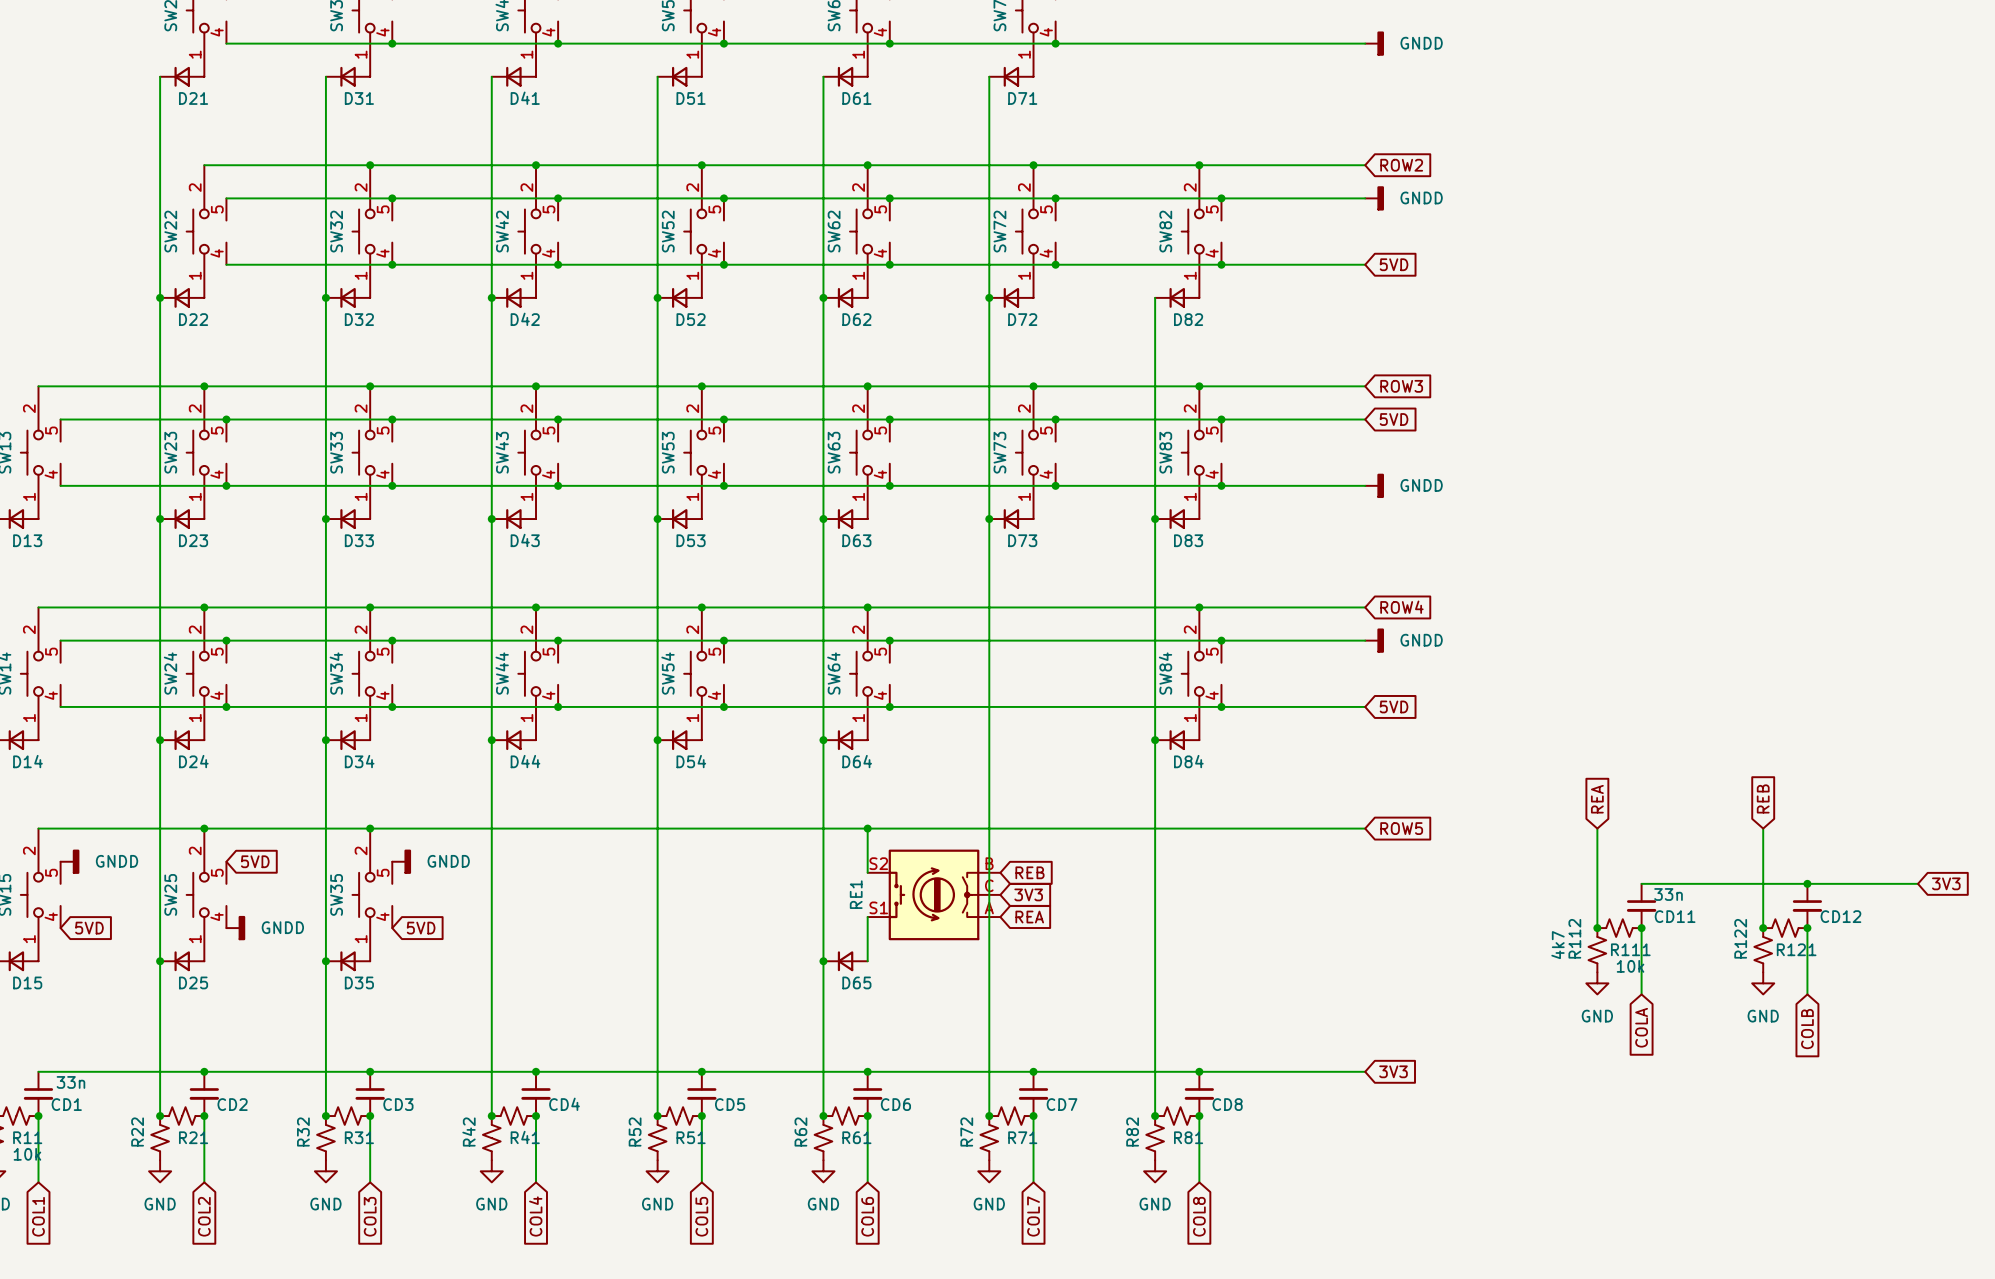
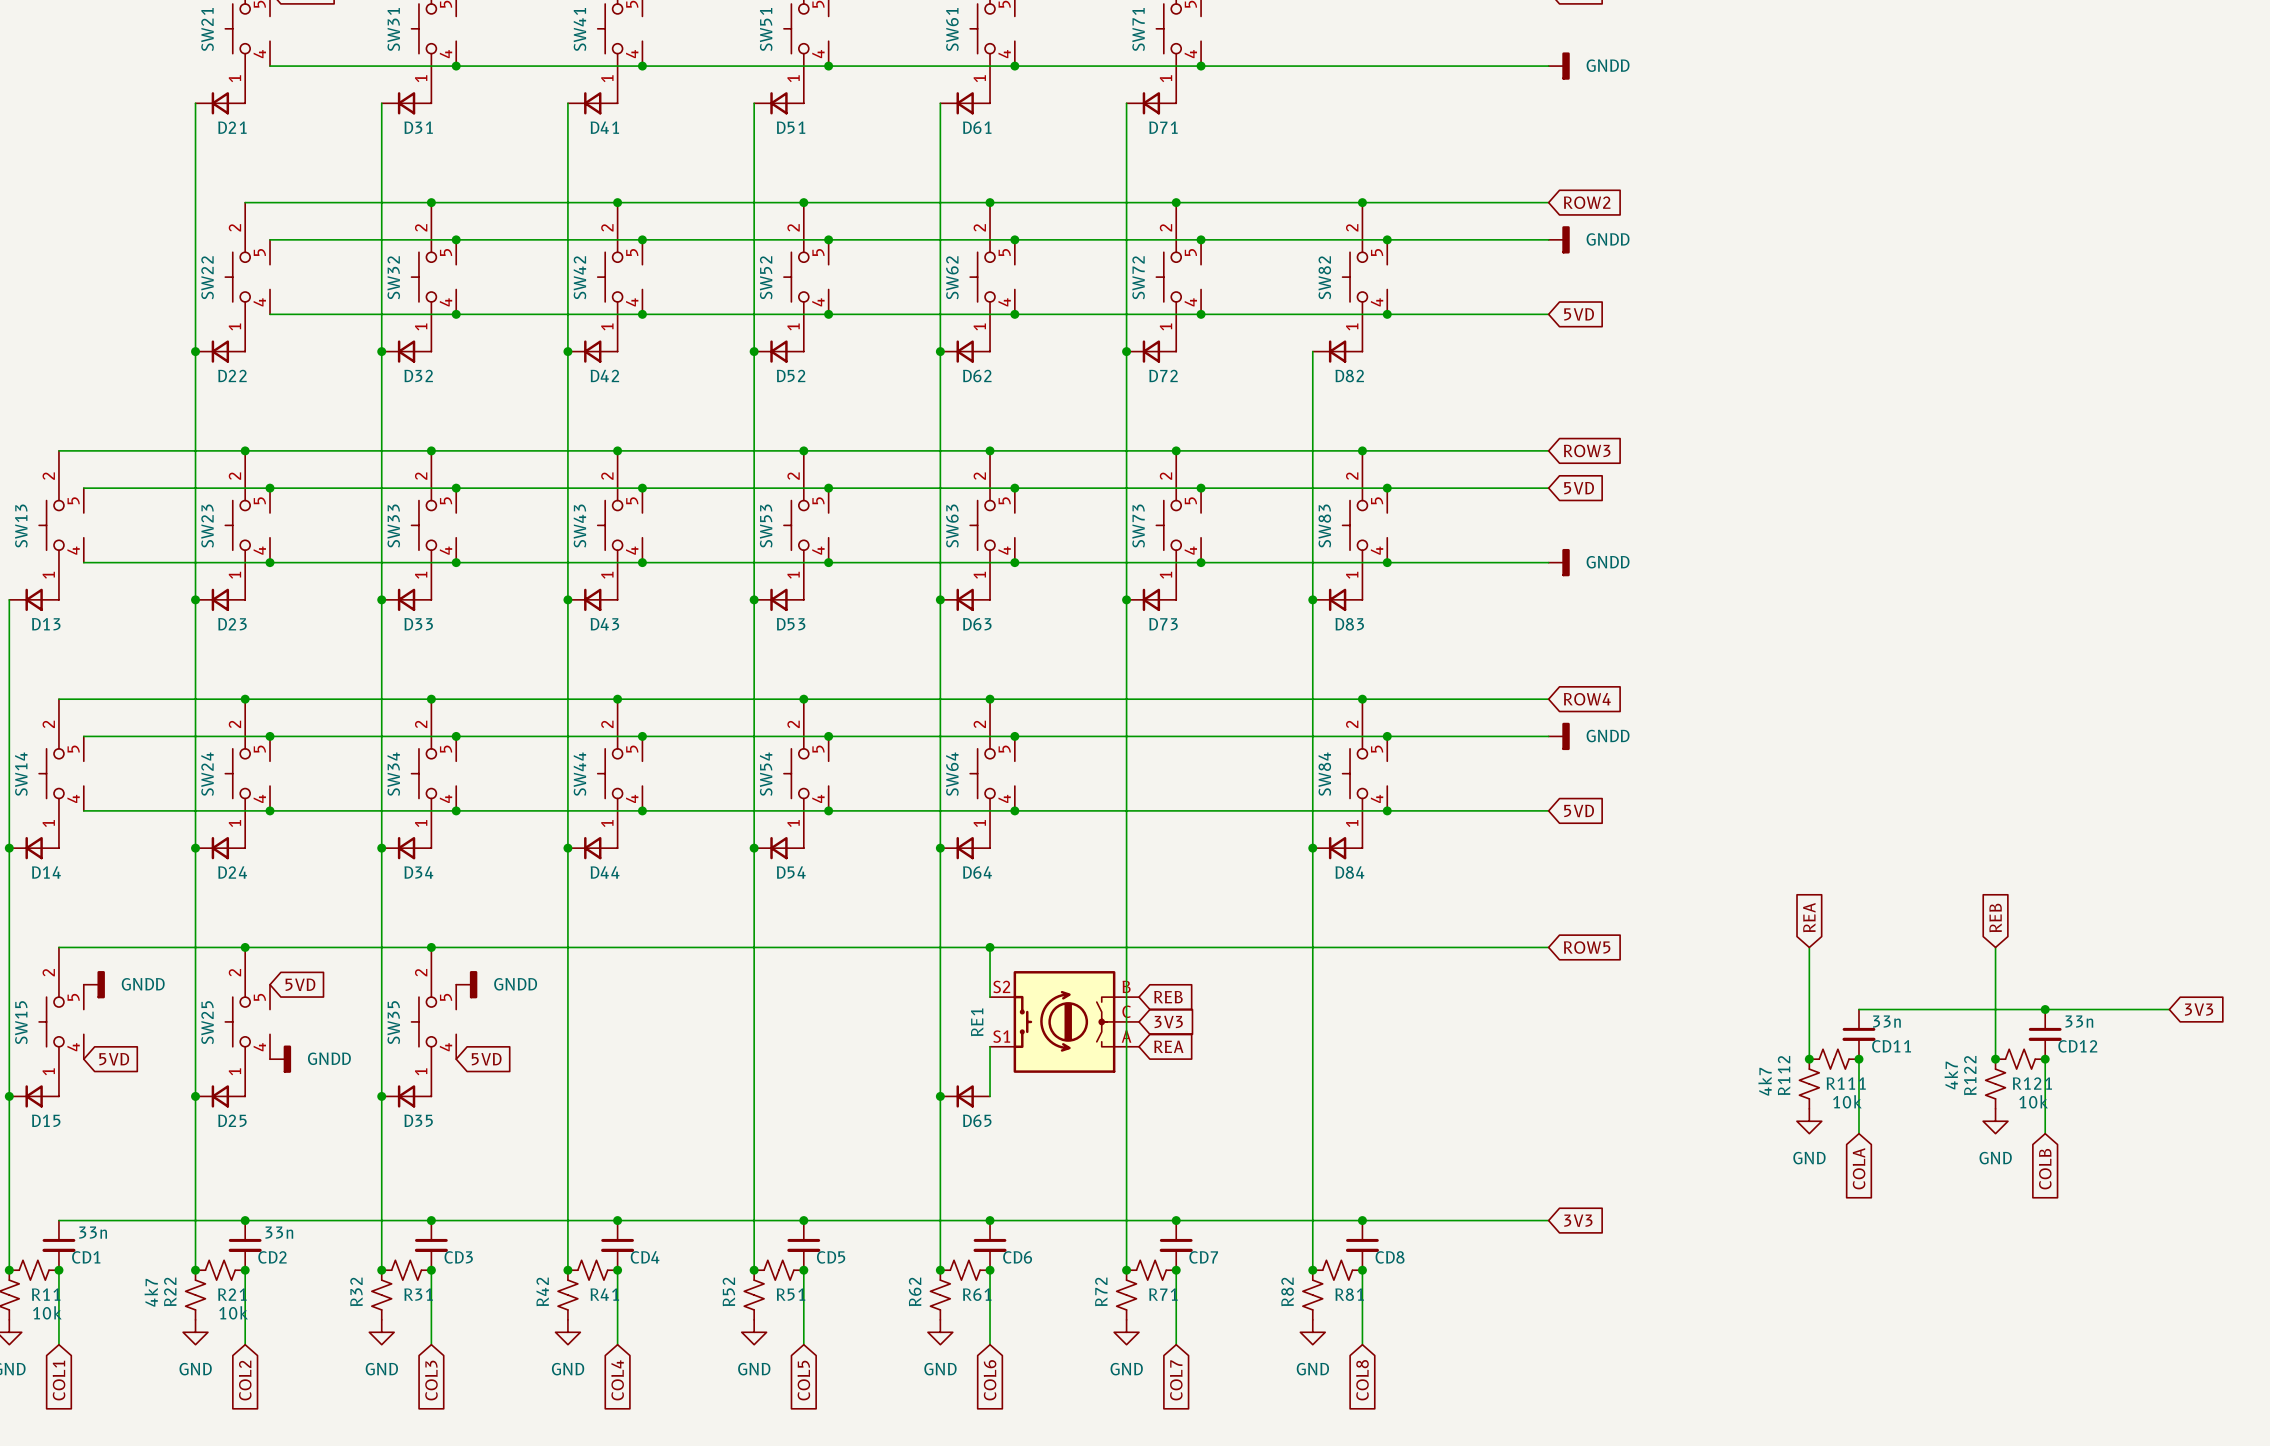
CD12 value: none -> 33n (2079, 1021)
R122 value: none -> 4k7 (1951, 1075)
R121 value: none -> 10k (2033, 1101)
CD2 value: none -> 33n (279, 1232)
R22 value: none -> 4k7 (151, 1292)
R21 value: none -> 10k (233, 1312)

